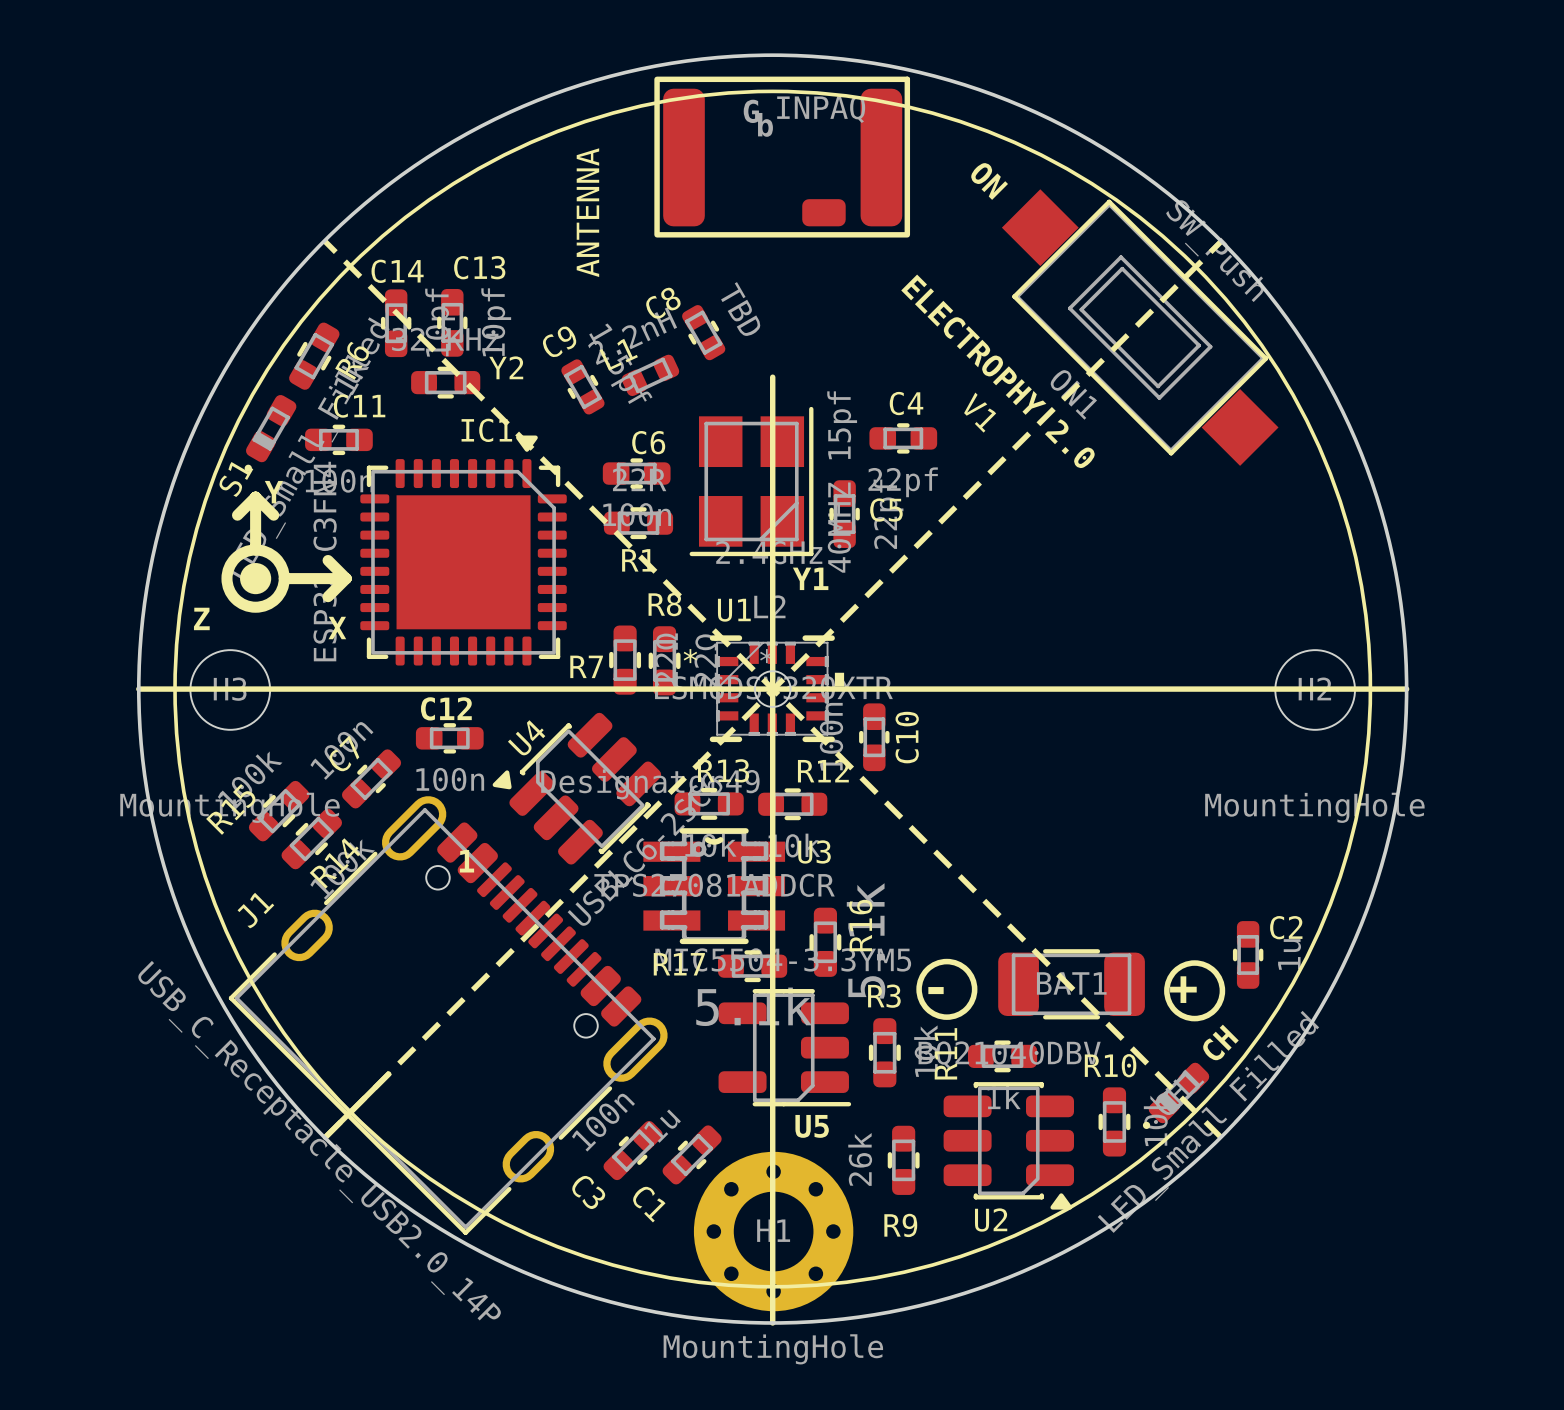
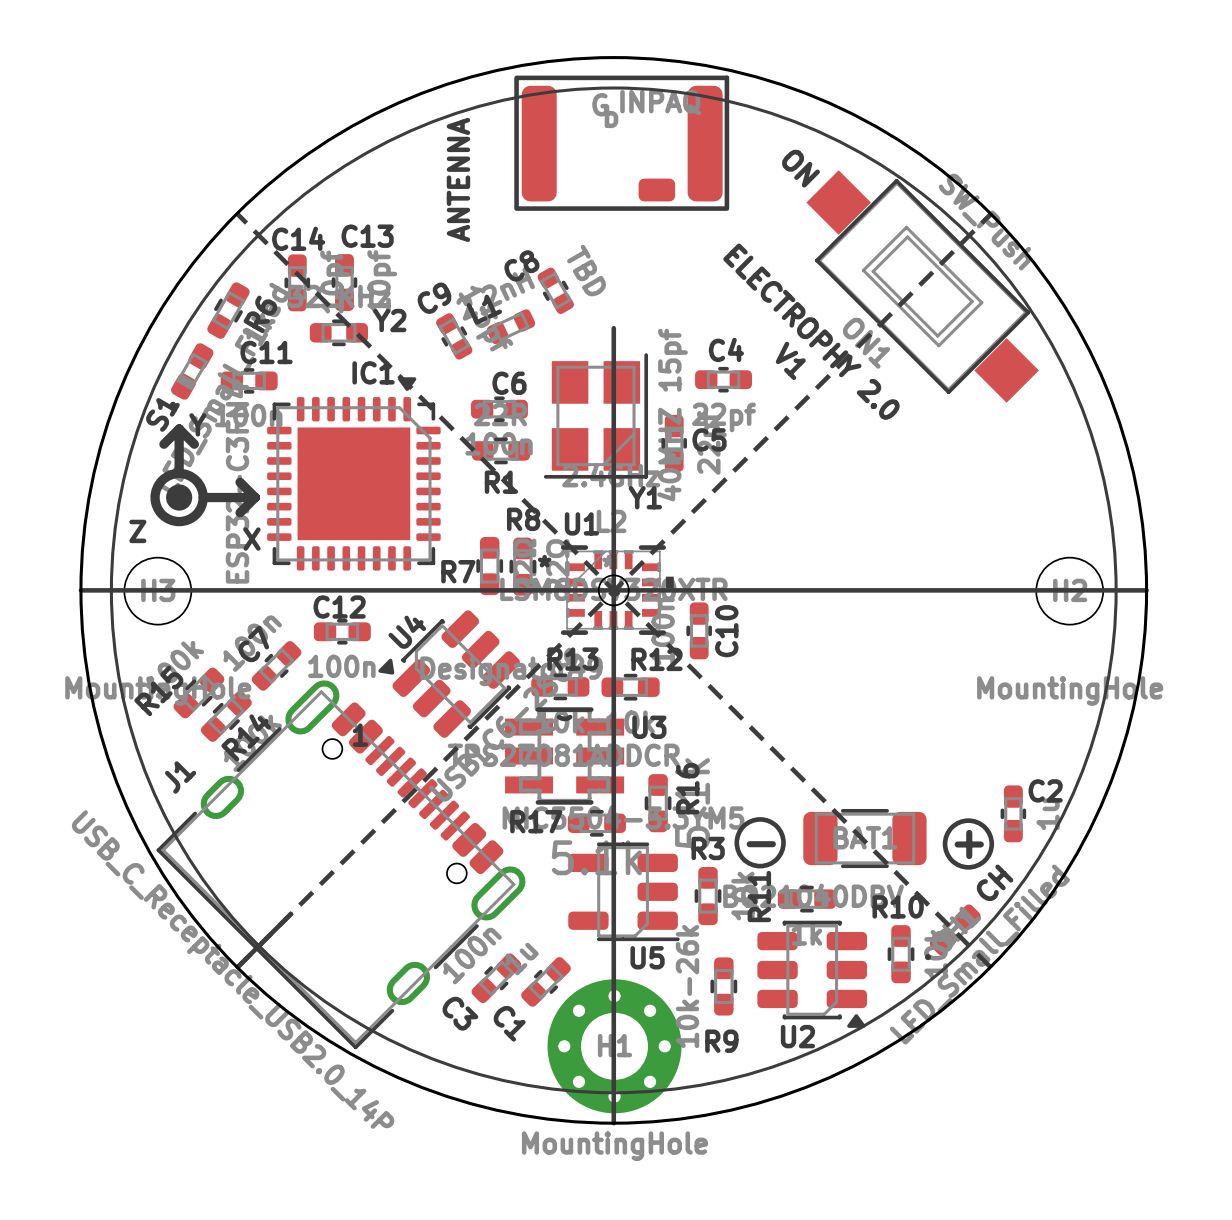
R9 value: 26k (860, 1159) -> 10k-26k (687, 986)

